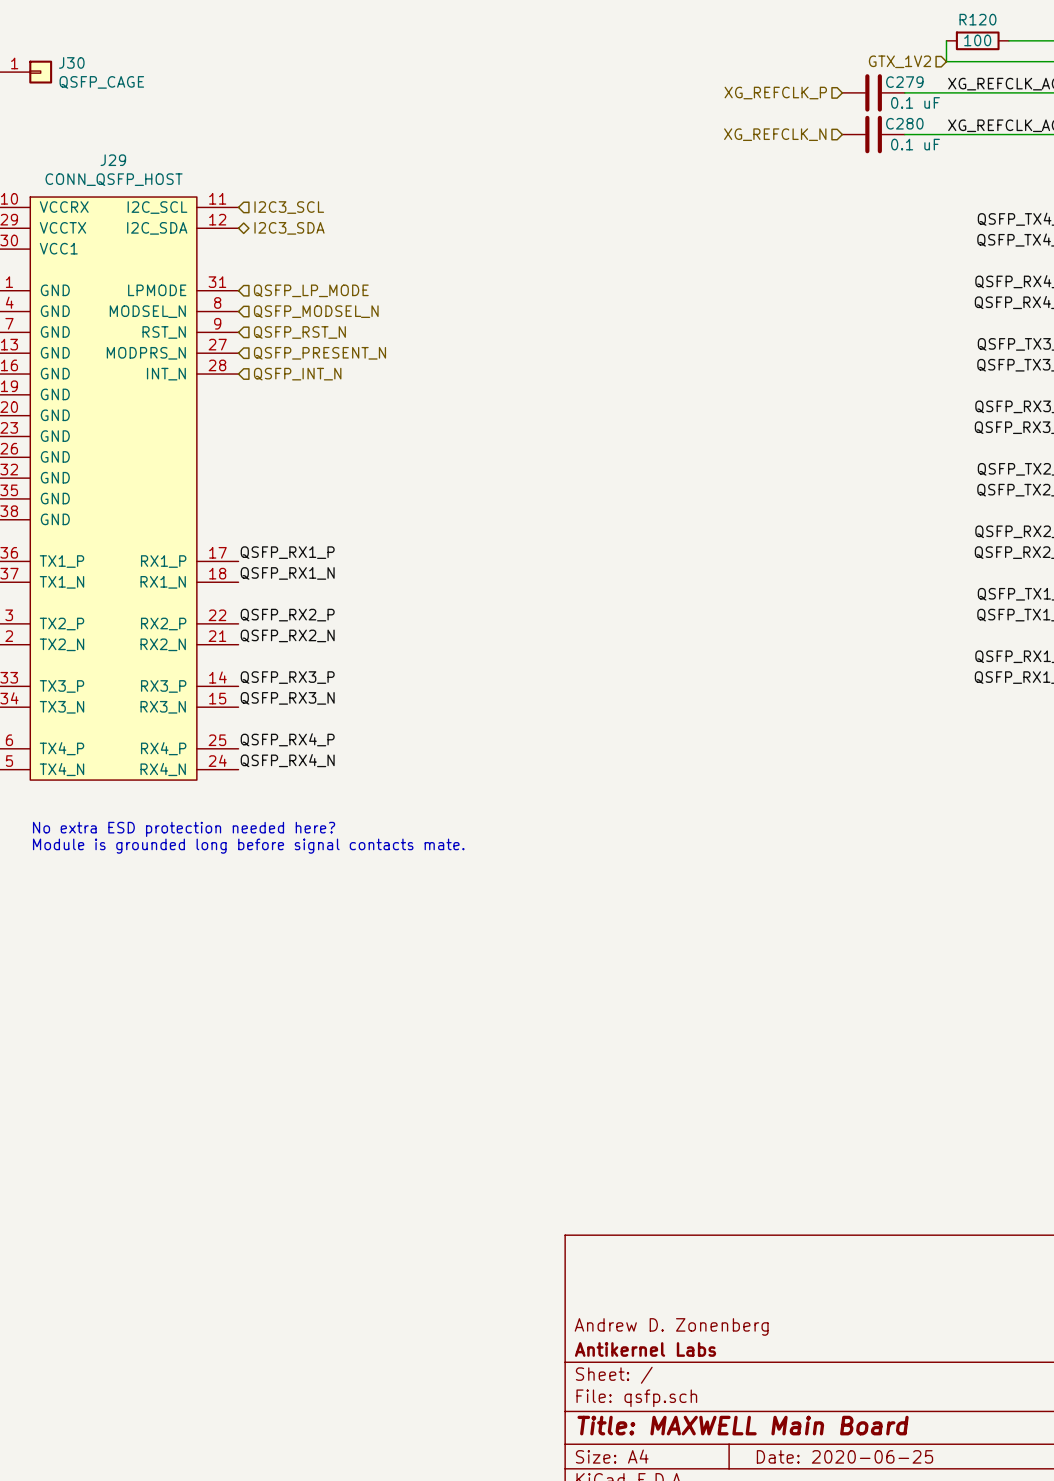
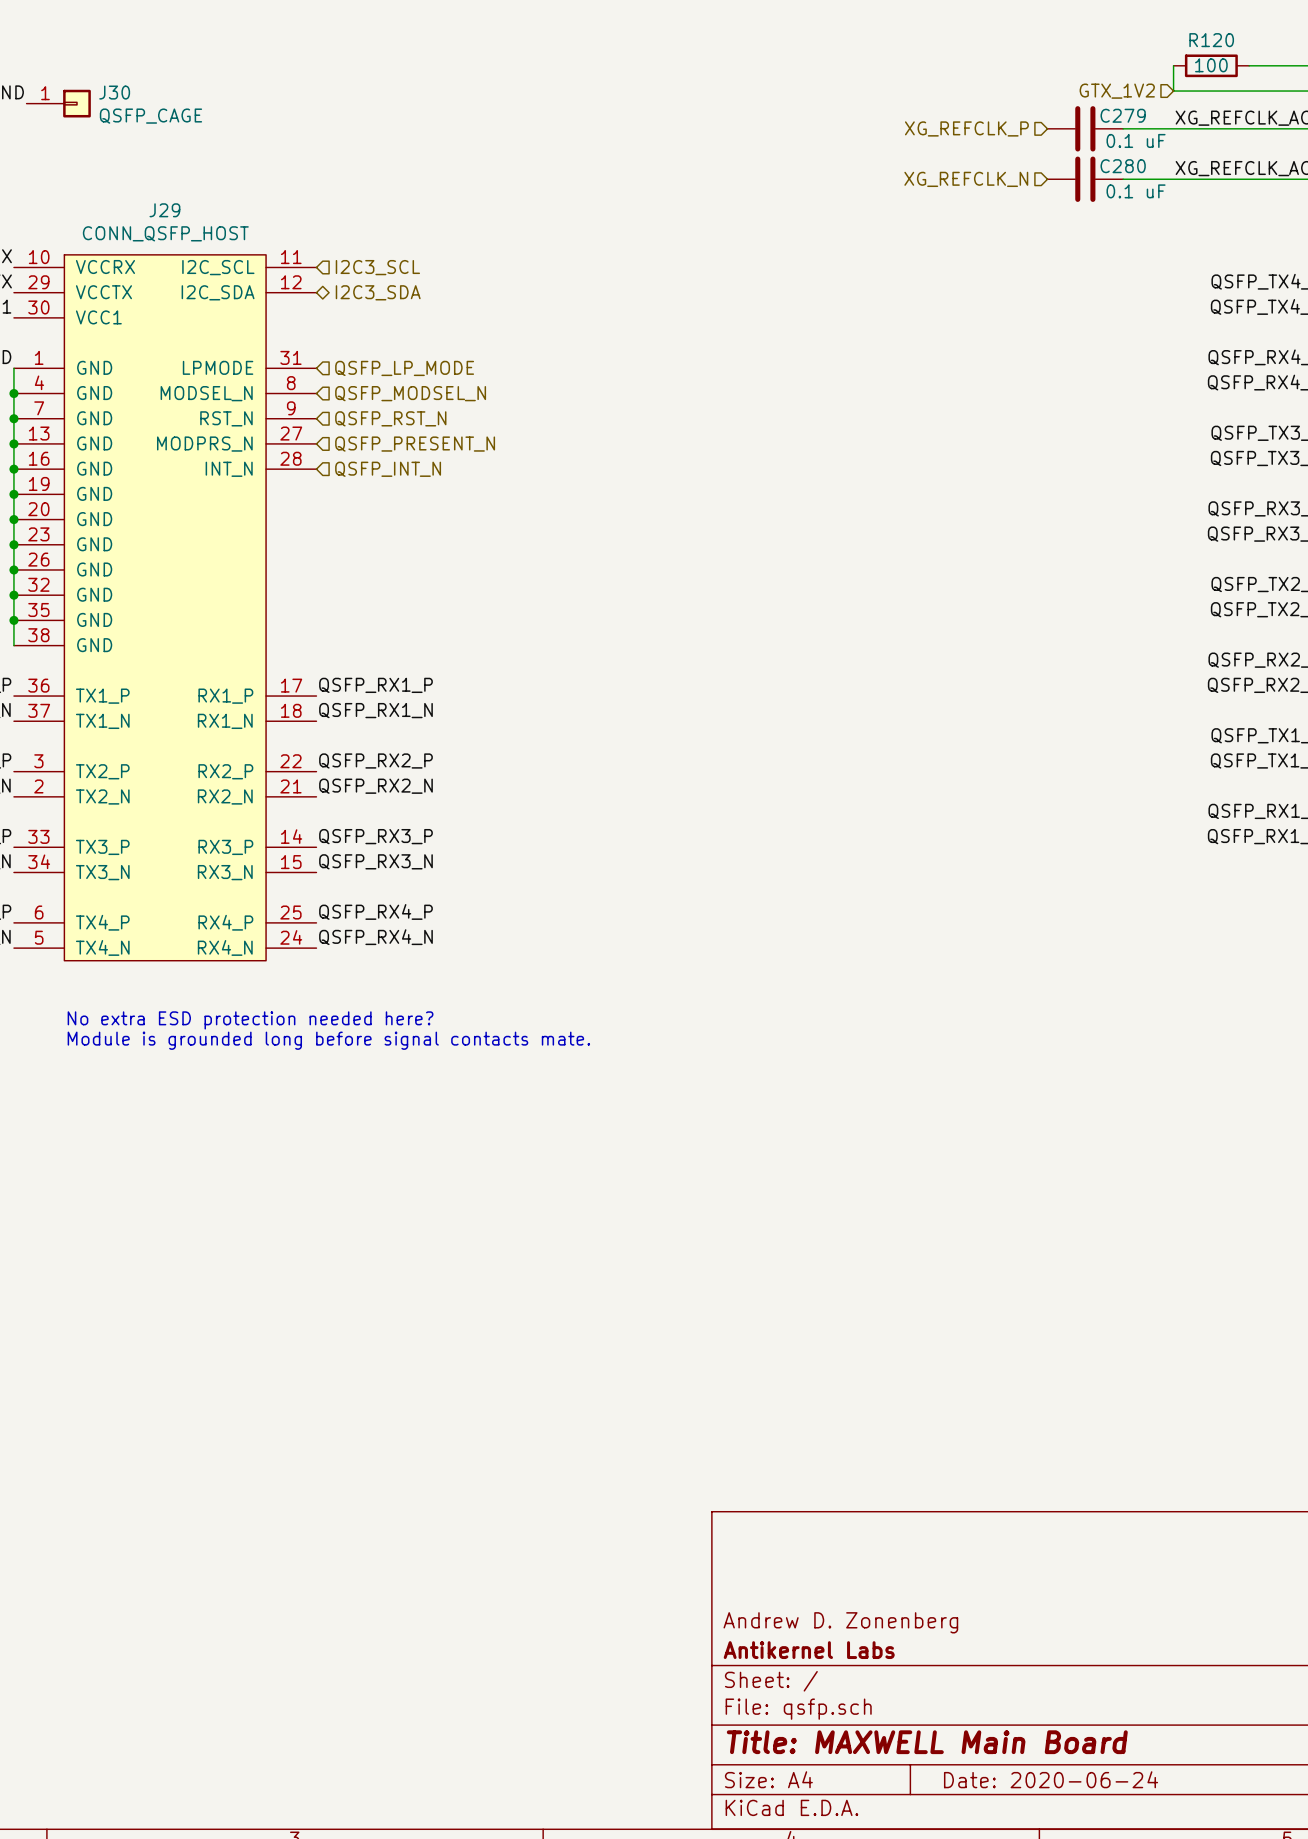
title block: Date: 2020-06-25 (844, 1456) -> Date: 2020-06-24 (1051, 1779)

